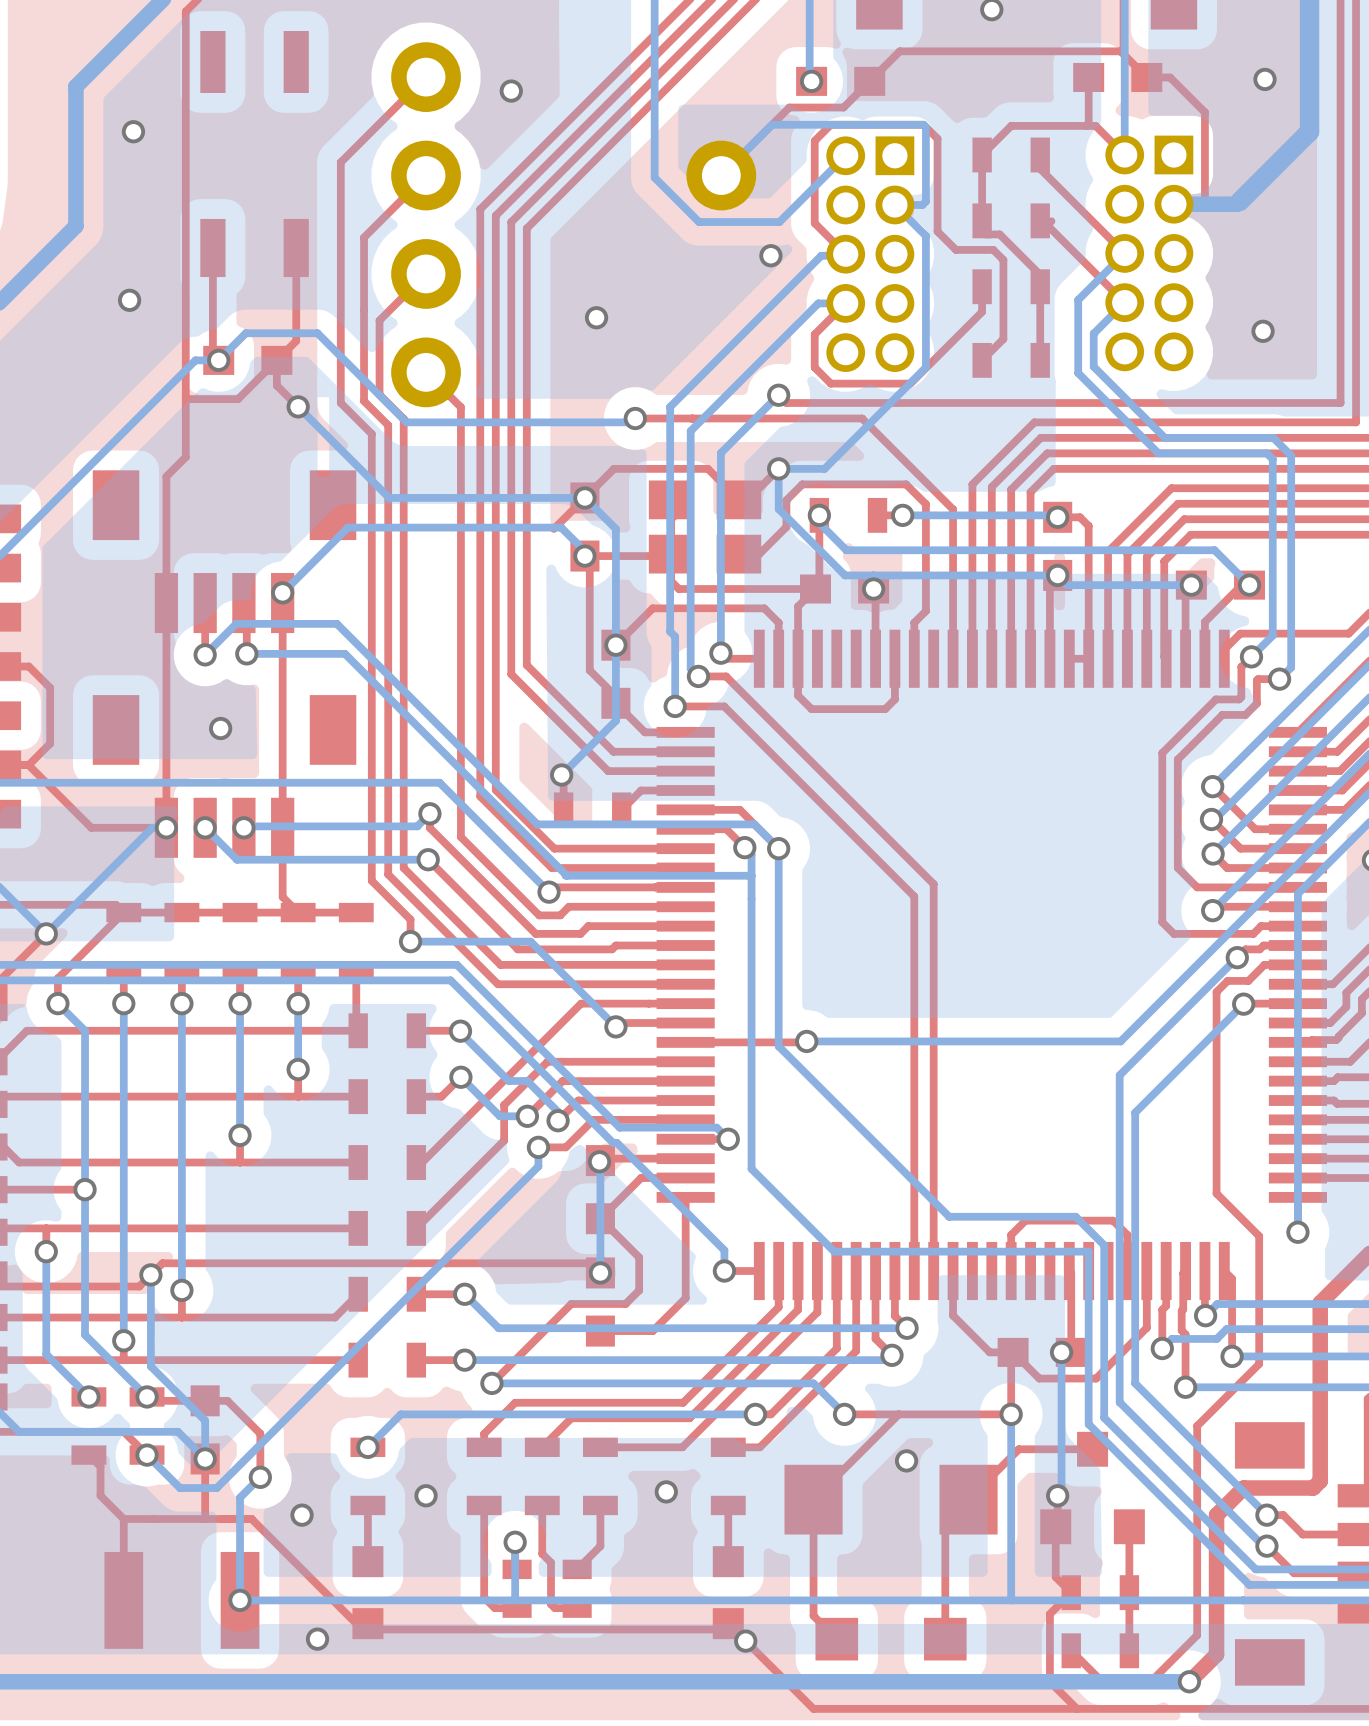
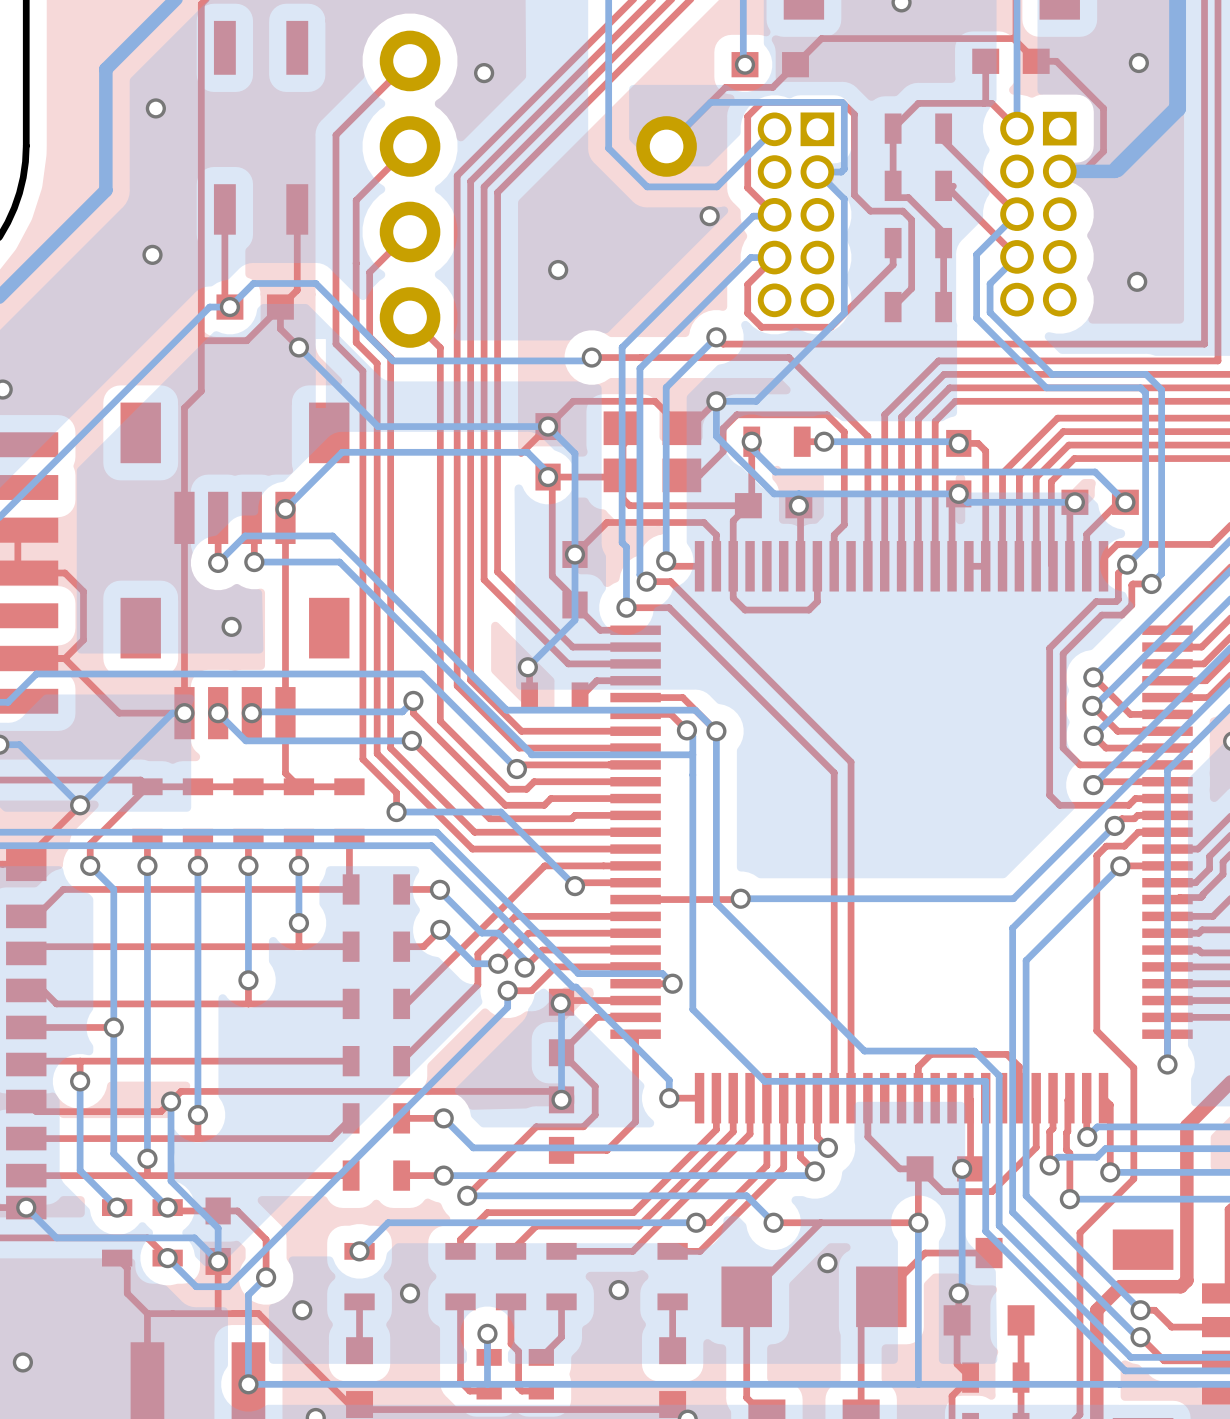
top track: (1204, 112) (1204, 200) -> (1086, 91) (1103, 108) (1103, 151) (1086, 168)

